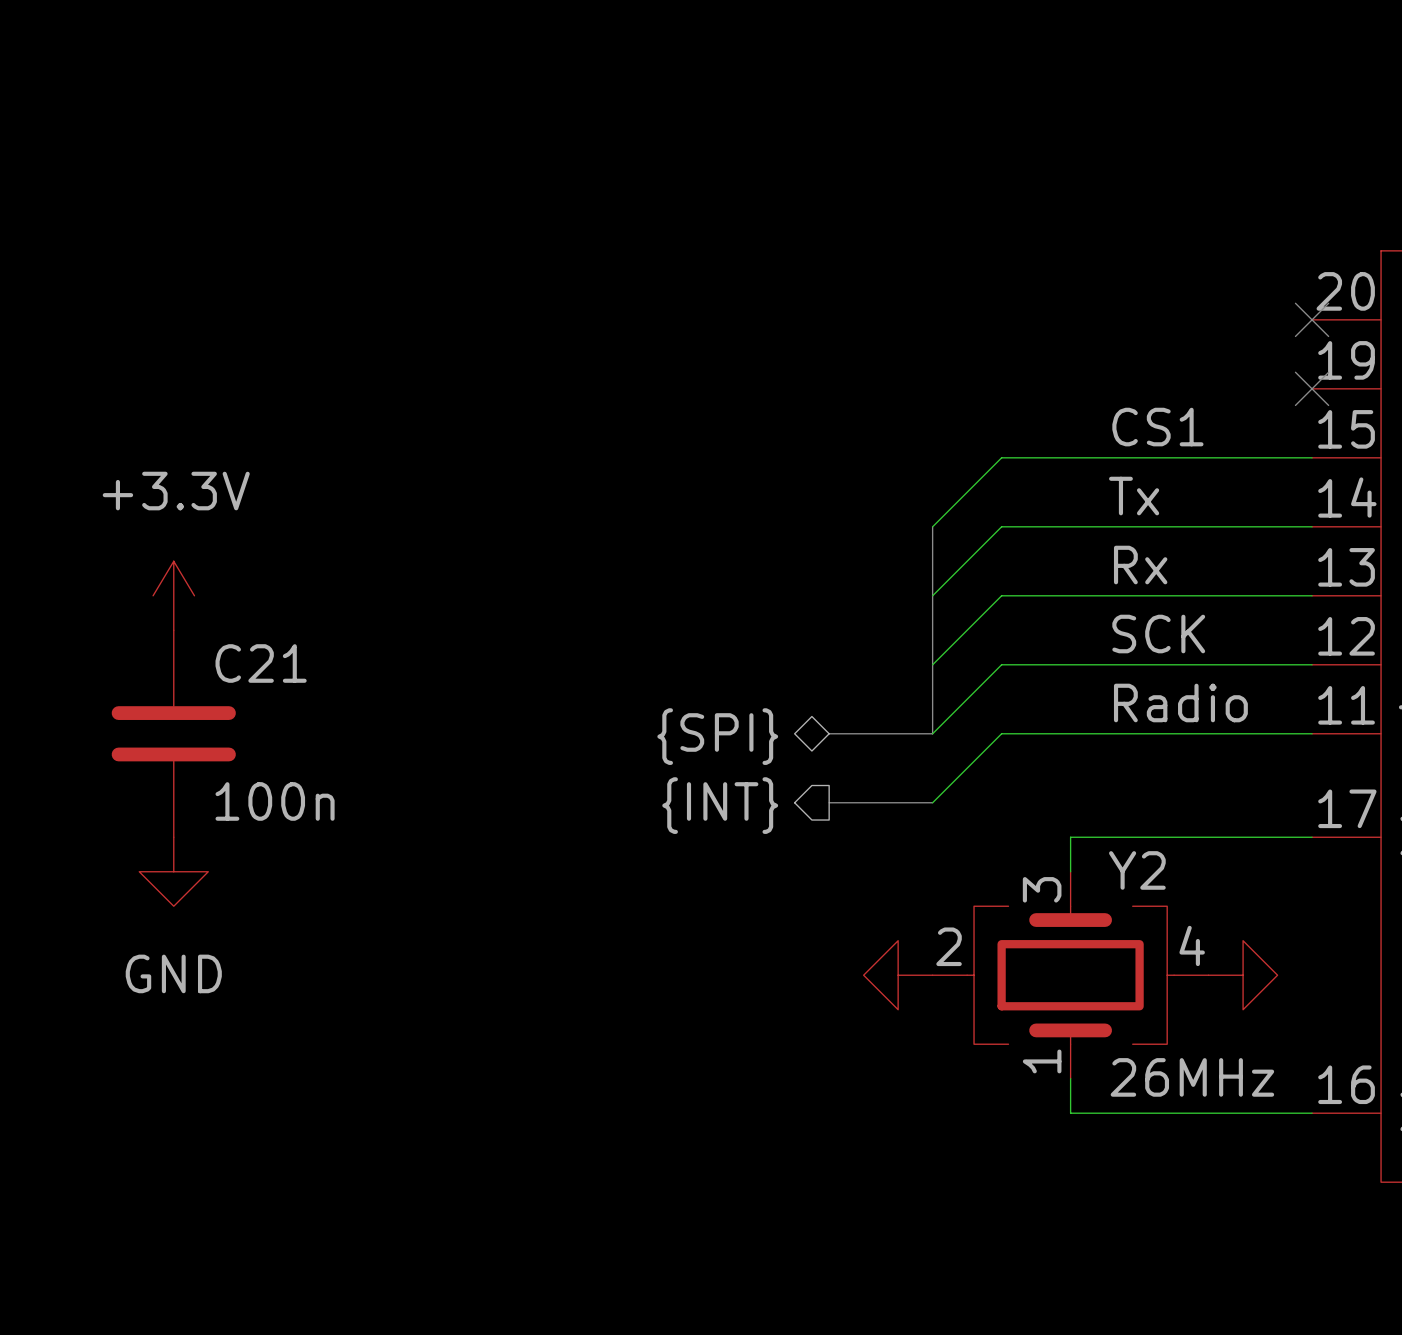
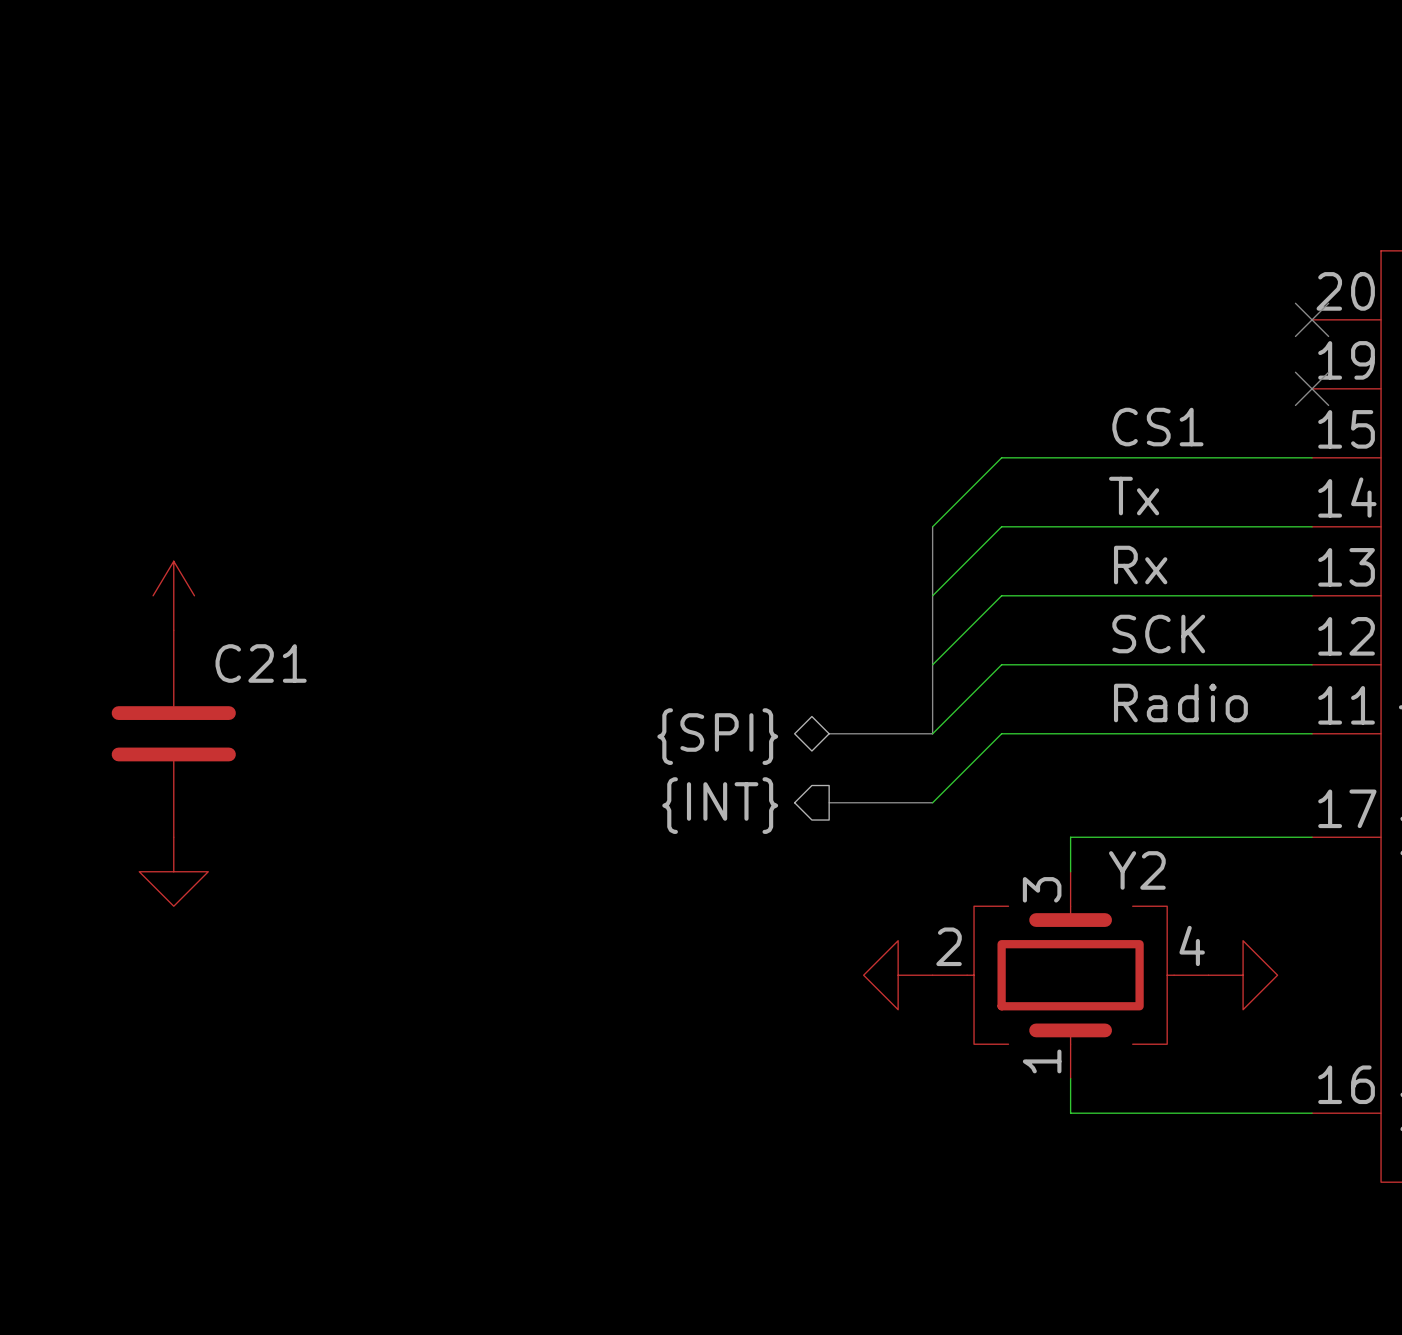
power symbol text: +3.3V (176, 491) -> none
C21 value: 100n (275, 801) -> none
power symbol text: GND (173, 973) -> none
Y2 value: 26MHz (1192, 1077) -> none

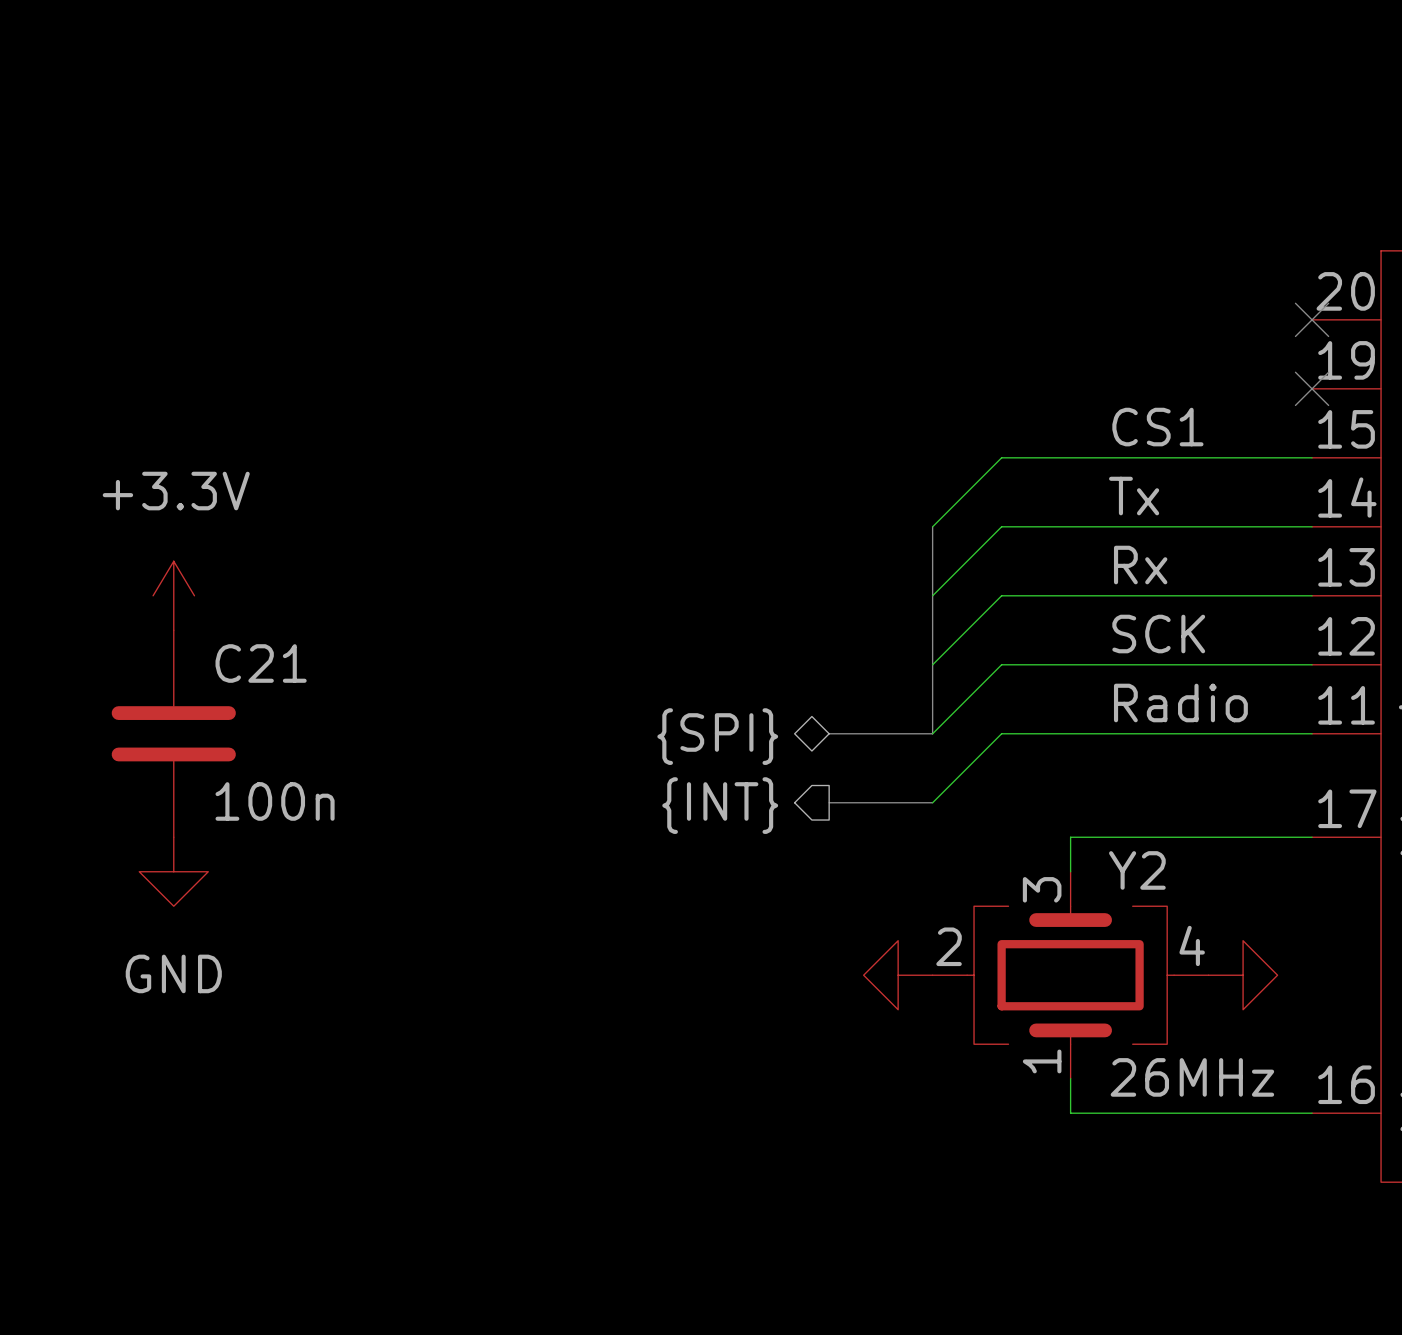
power symbol text: none -> +3.3V (176, 491)
C21 value: none -> 100n (275, 801)
power symbol text: none -> GND (173, 973)
Y2 value: none -> 26MHz (1192, 1077)

